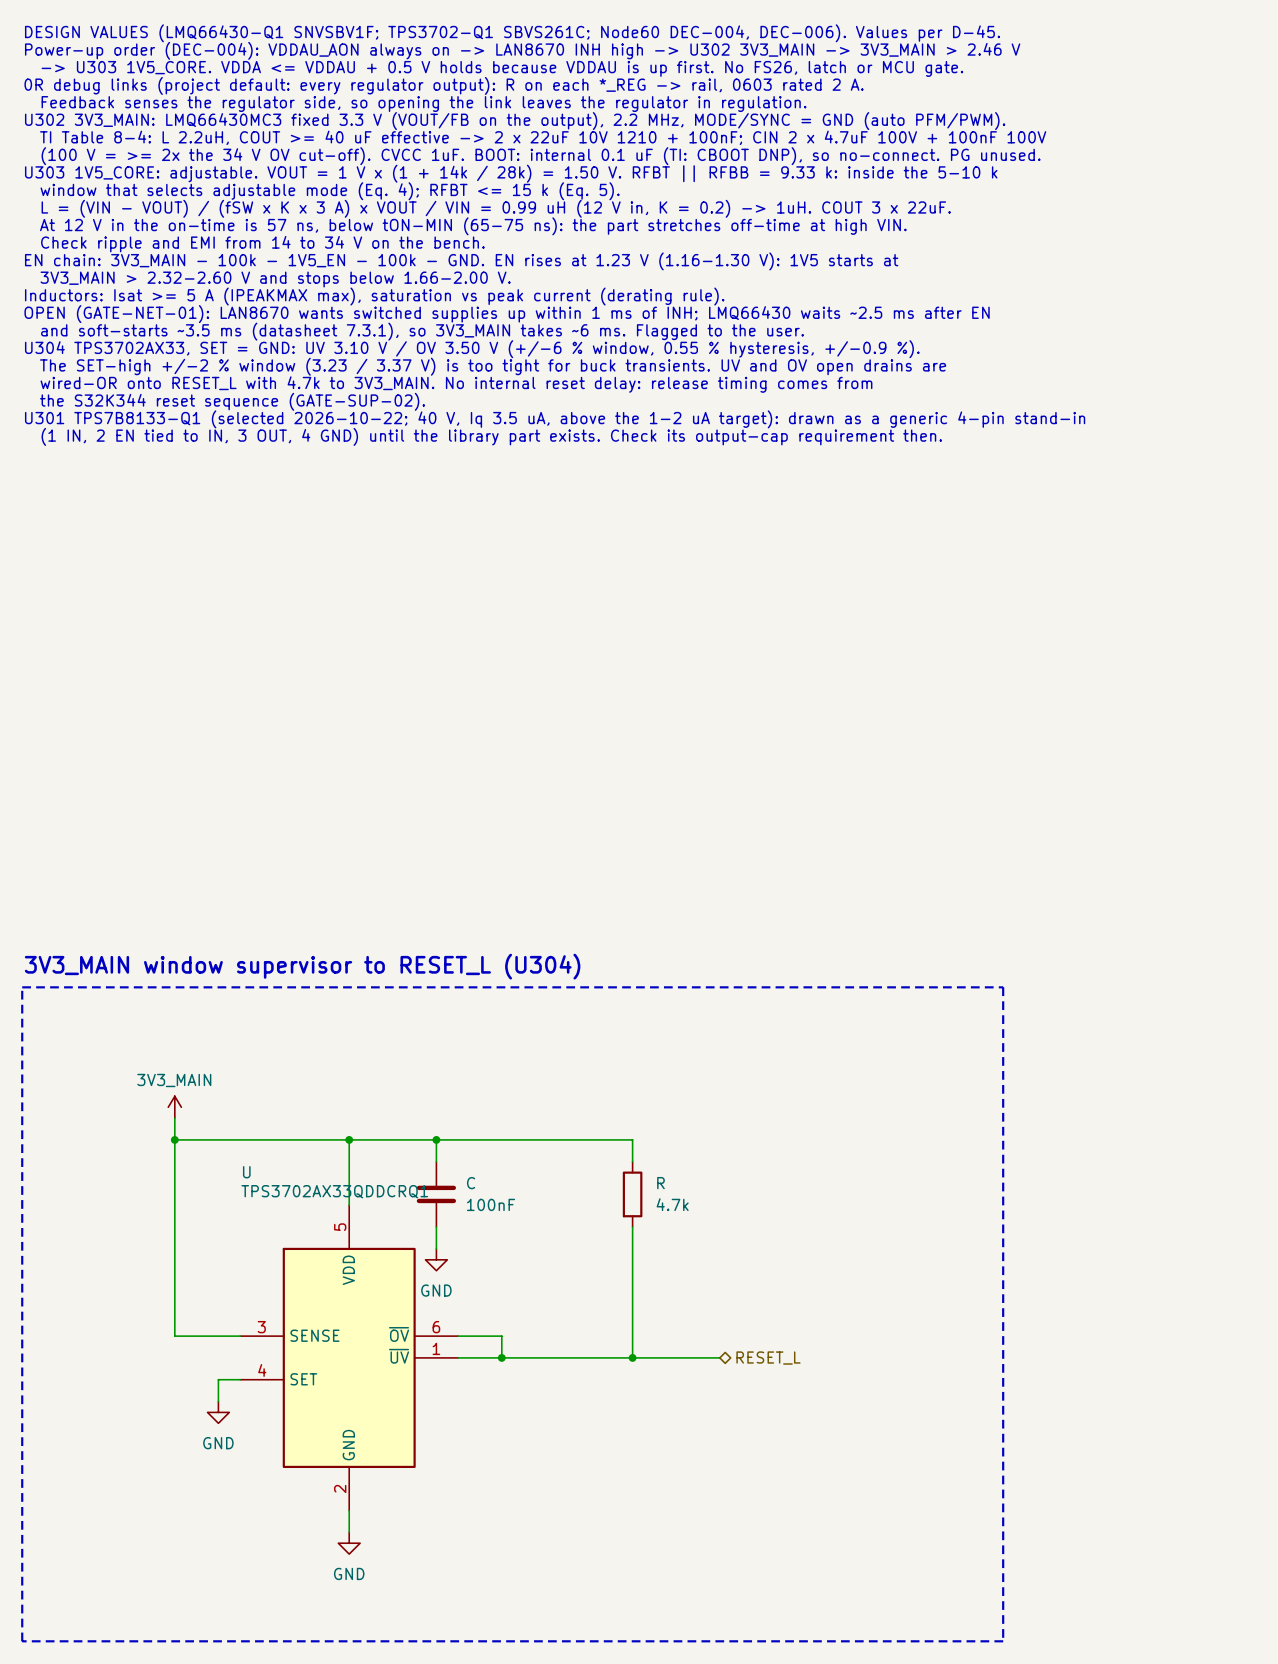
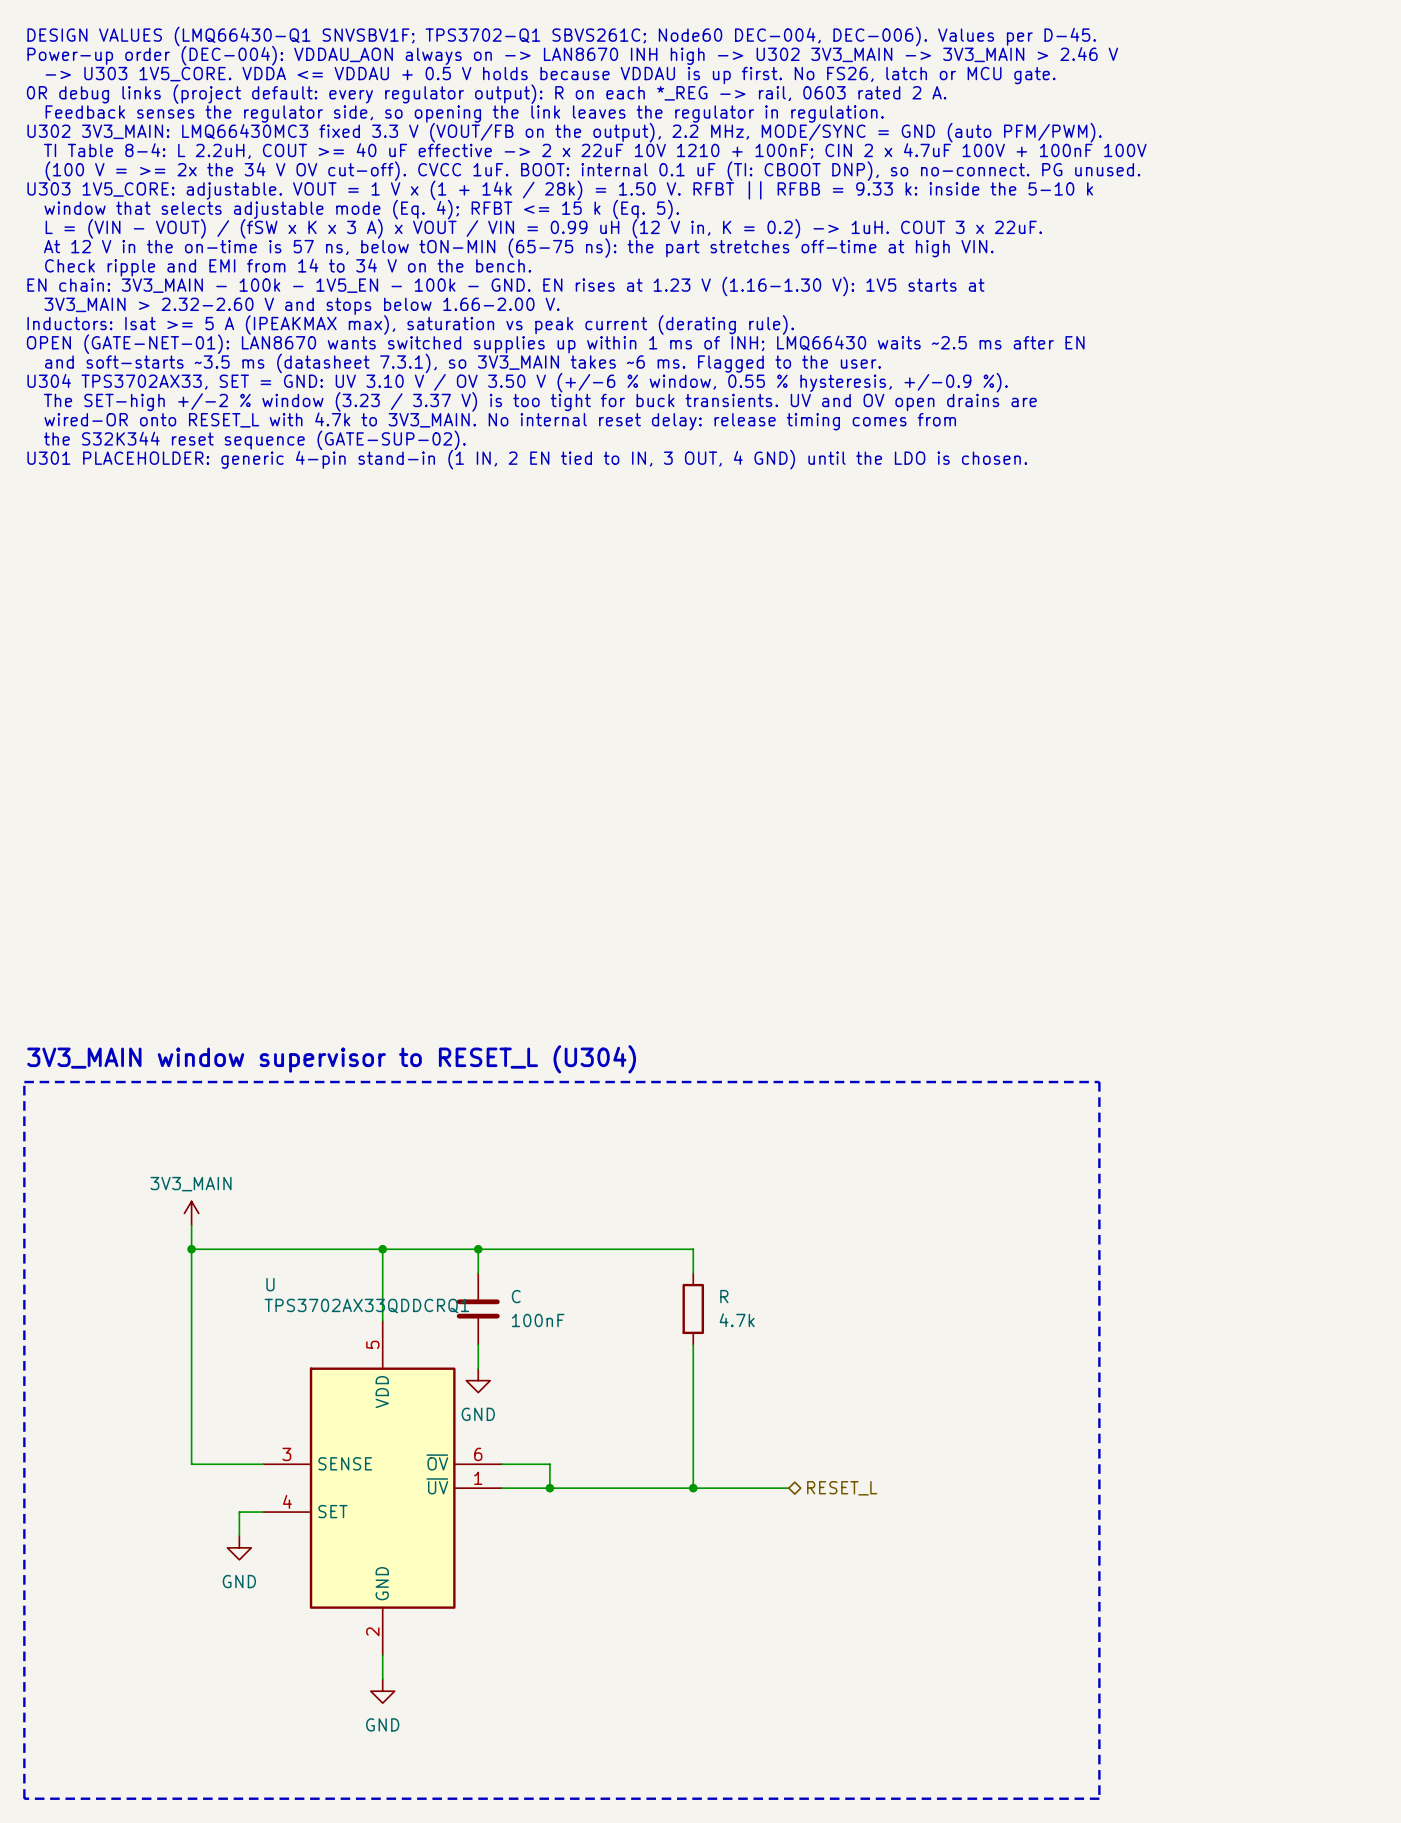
text: U301 TPS7B8133-Q1 (selected 2026-10-22; 40 V, Iq 3.5 uA, above the 1-2 uA target): drawn as a generic 4-pin stand-in (555, 419) -> U301 PLACEHOLDER: generic 4-pin stand-in (1 IN, 2 EN tied to IN, 3 OUT, 4 GND) until the LDO is chosen. (527, 459)
text: (1 IN, 2 EN tied to IN, 3 OUT, 4 GND) until the library part exists. Check its output-cap requirement then. (491, 436) -> none

